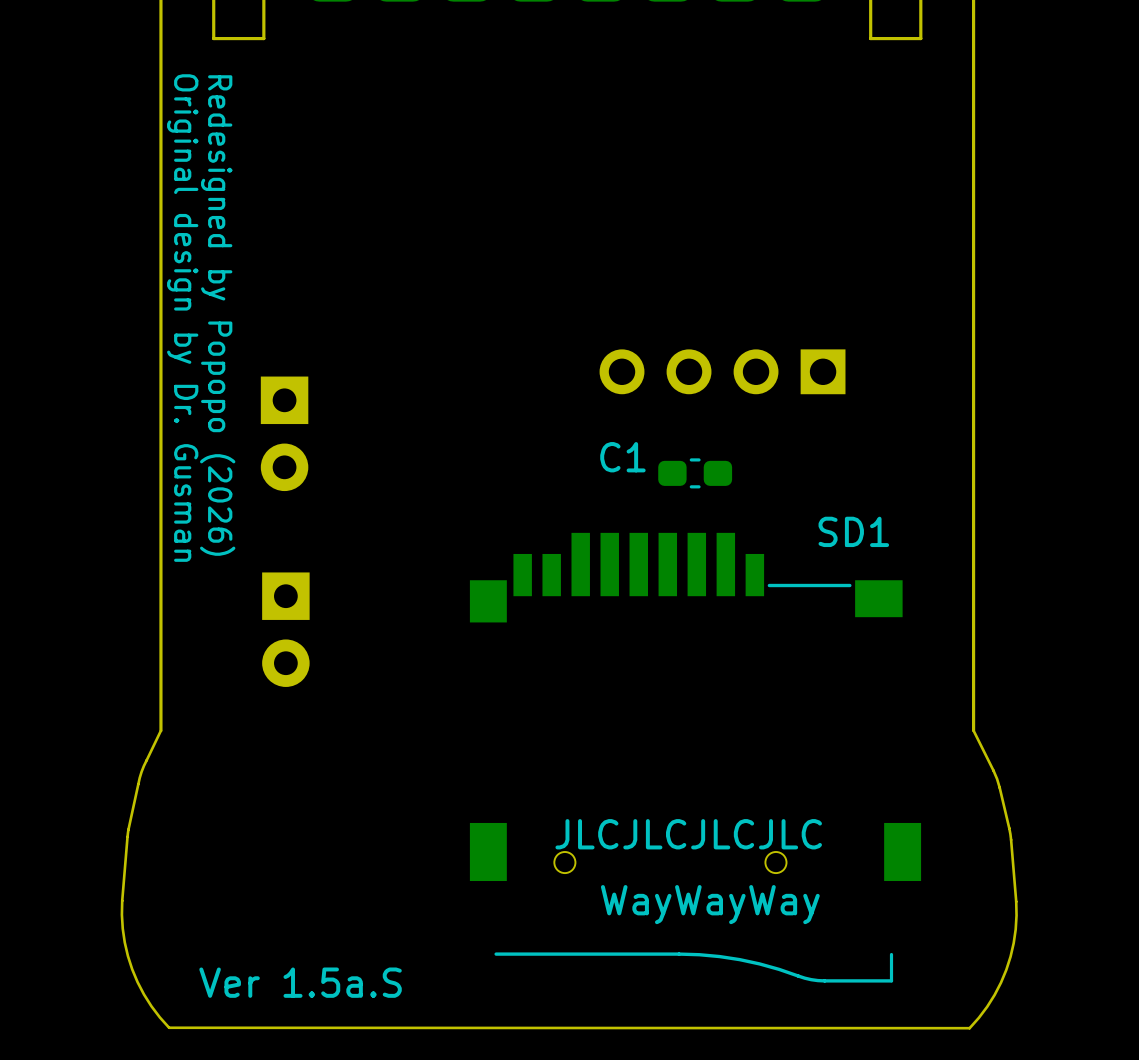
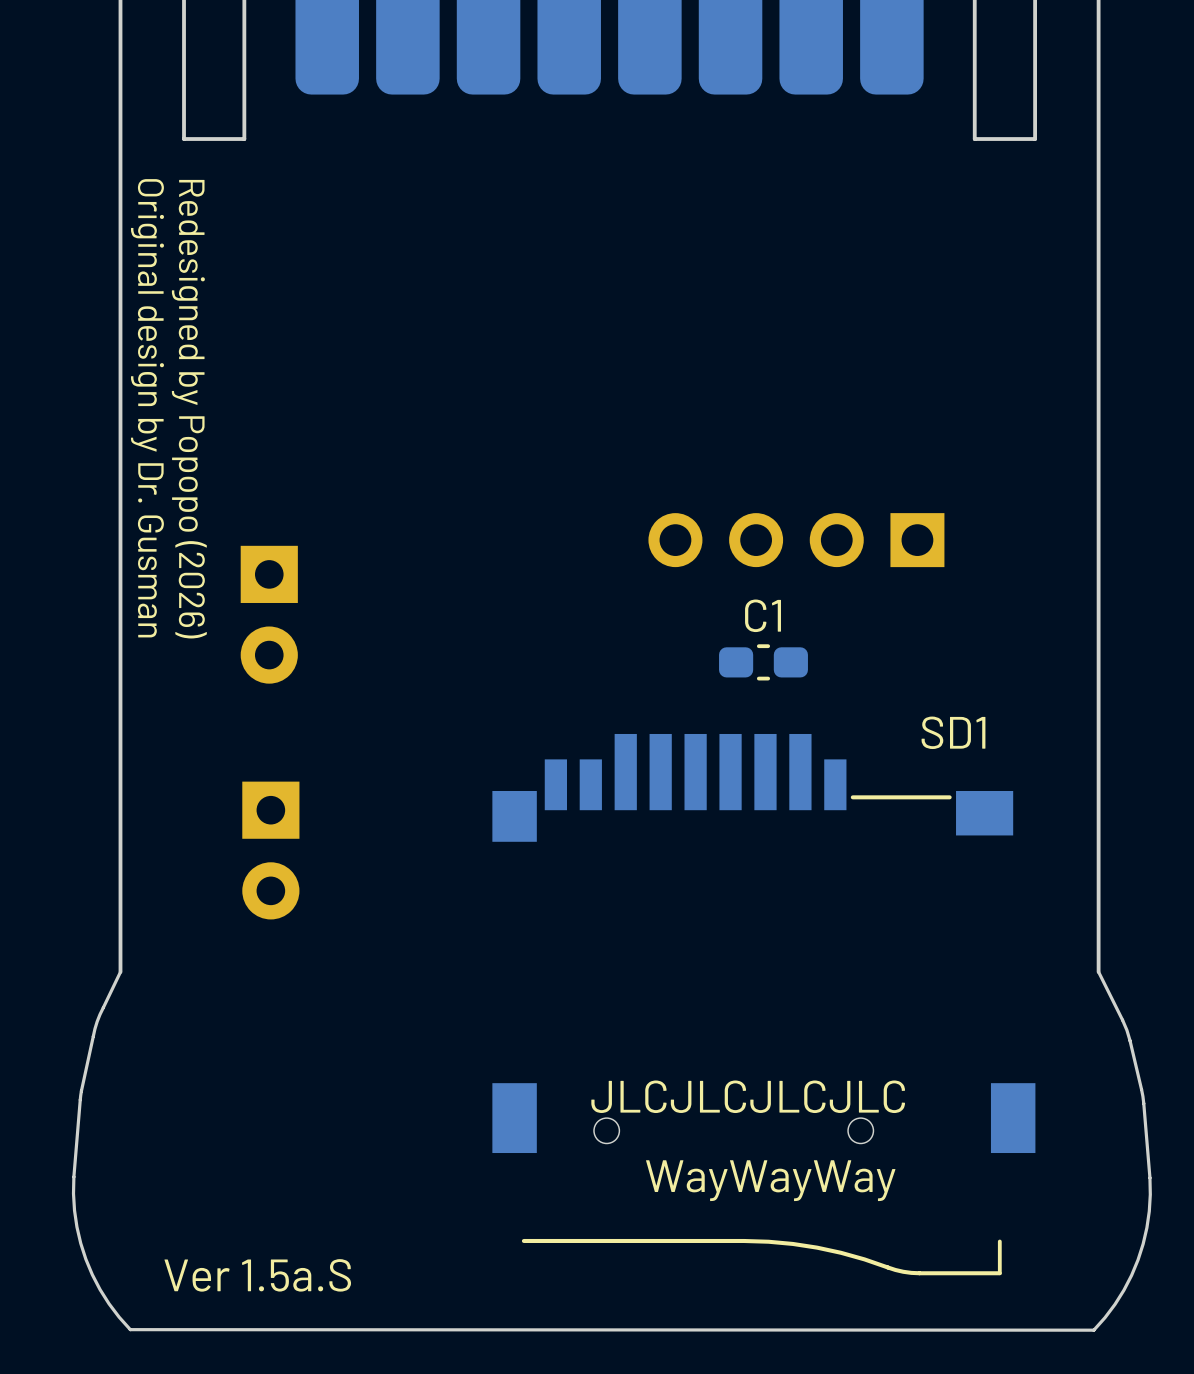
C1 name position: C1 (622, 457) -> C1 (763, 615)

